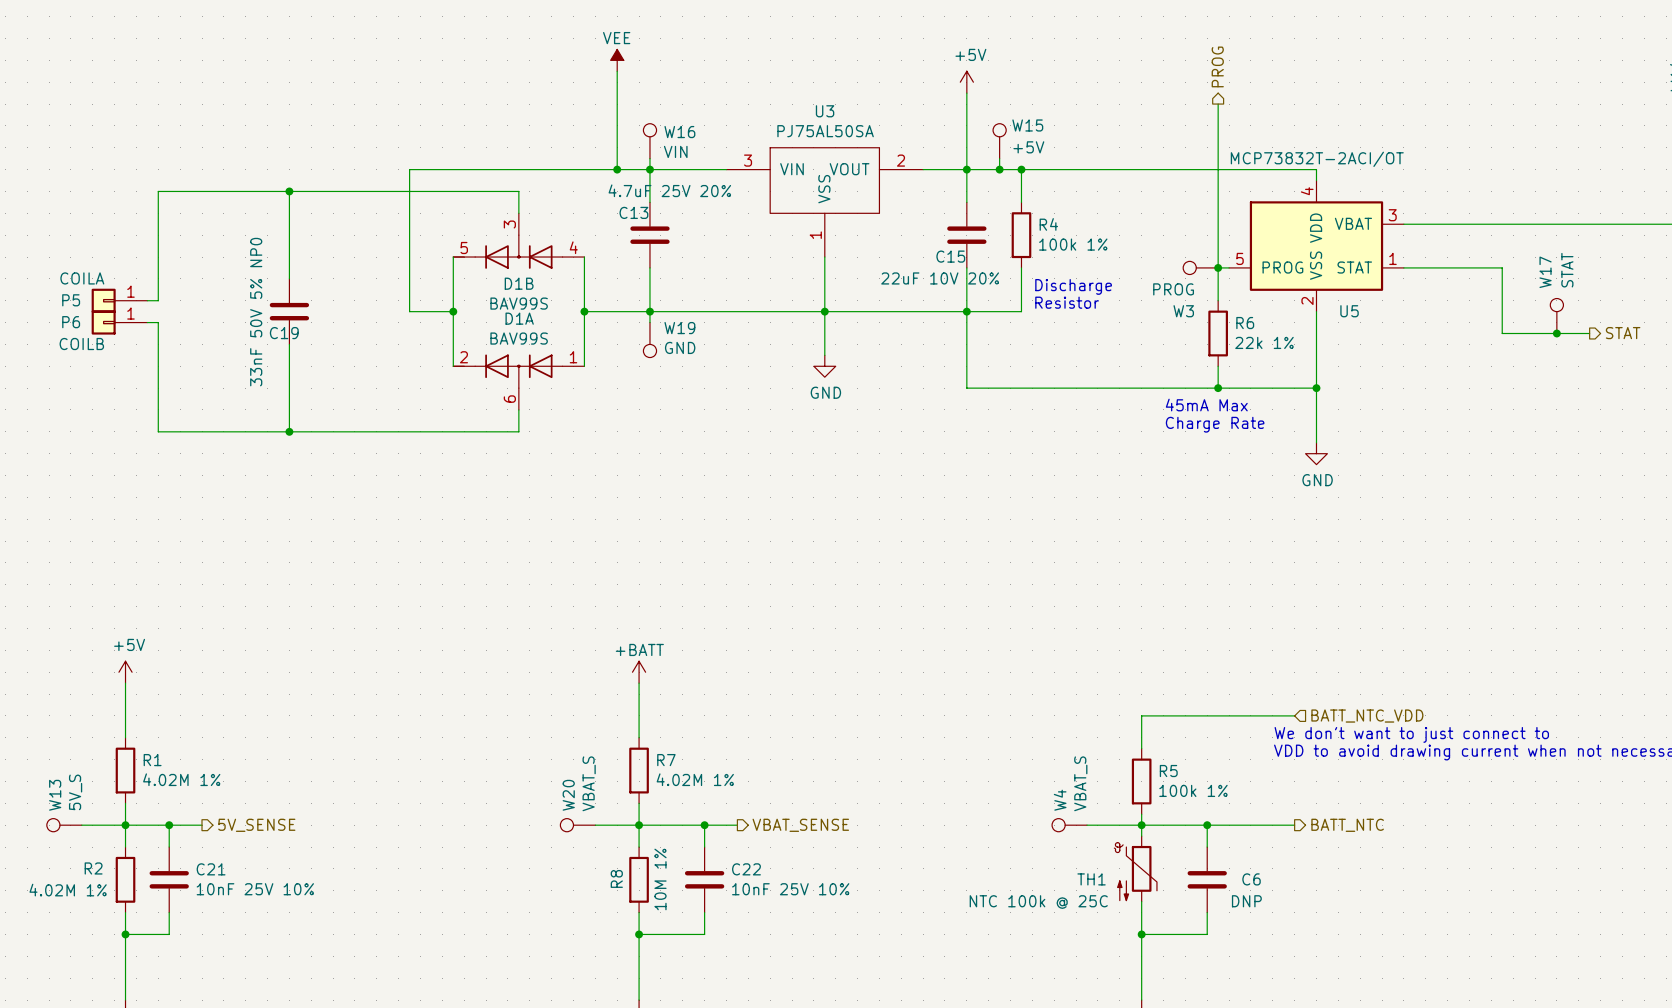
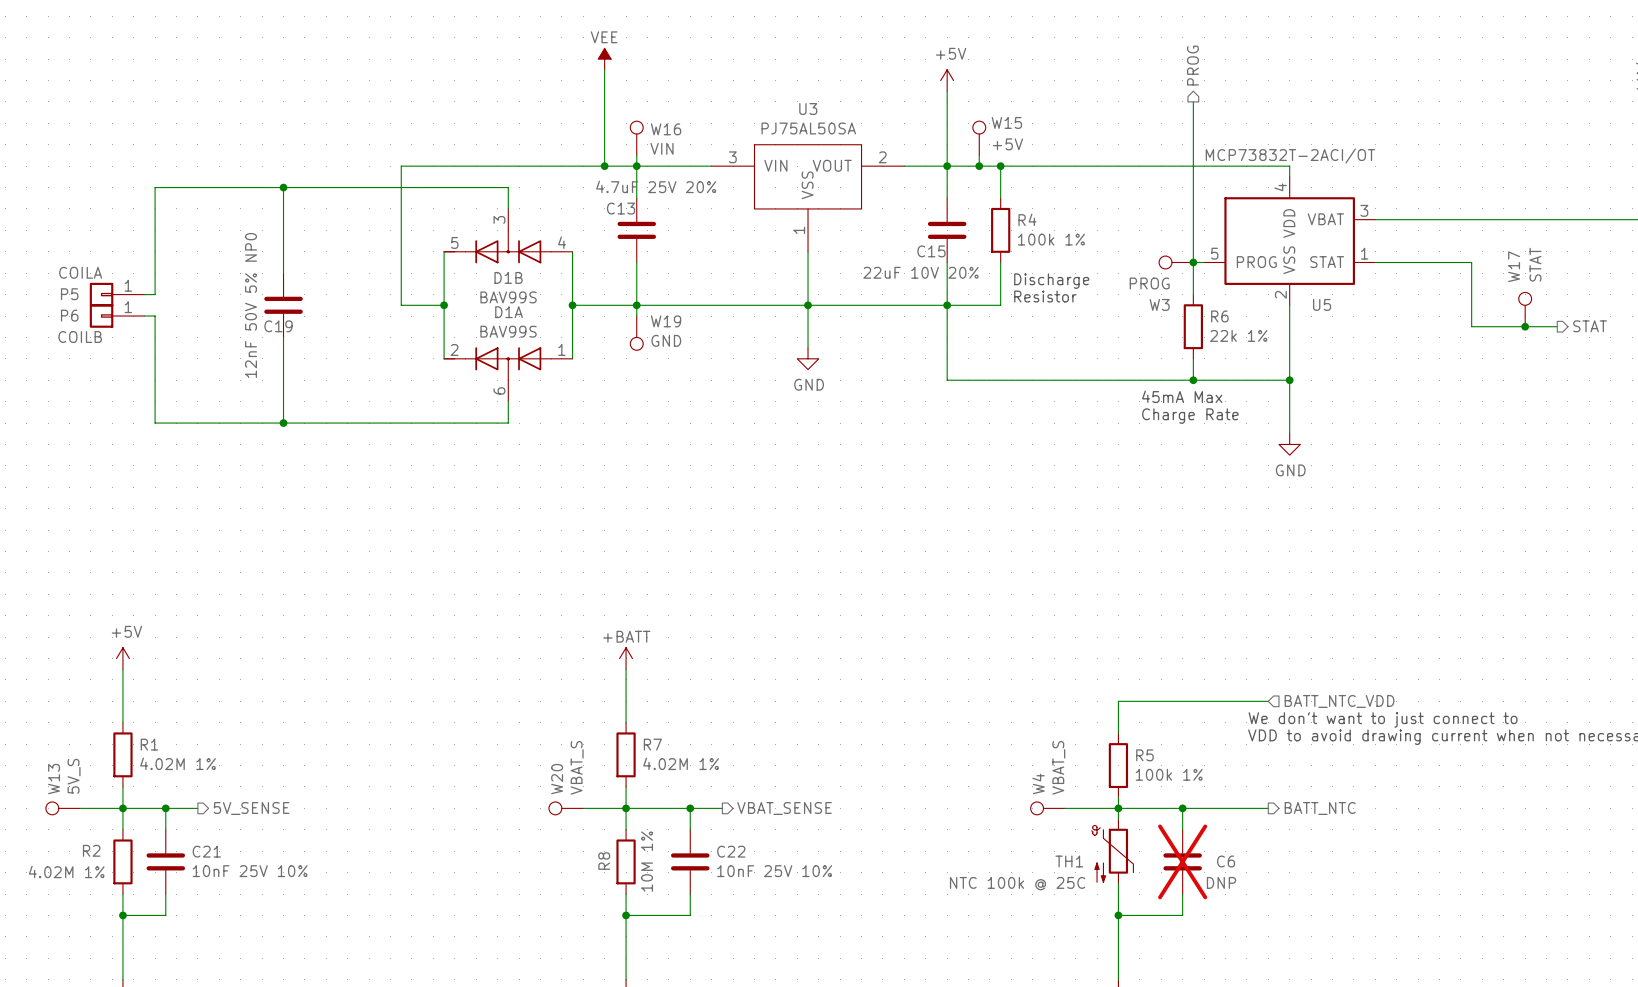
C19 value: 33nF 50V 5% NP0 (256, 312) -> 12nF 50V 5% NP0 (251, 305)
C6 do-not-place cross: none -> (1182, 861)

